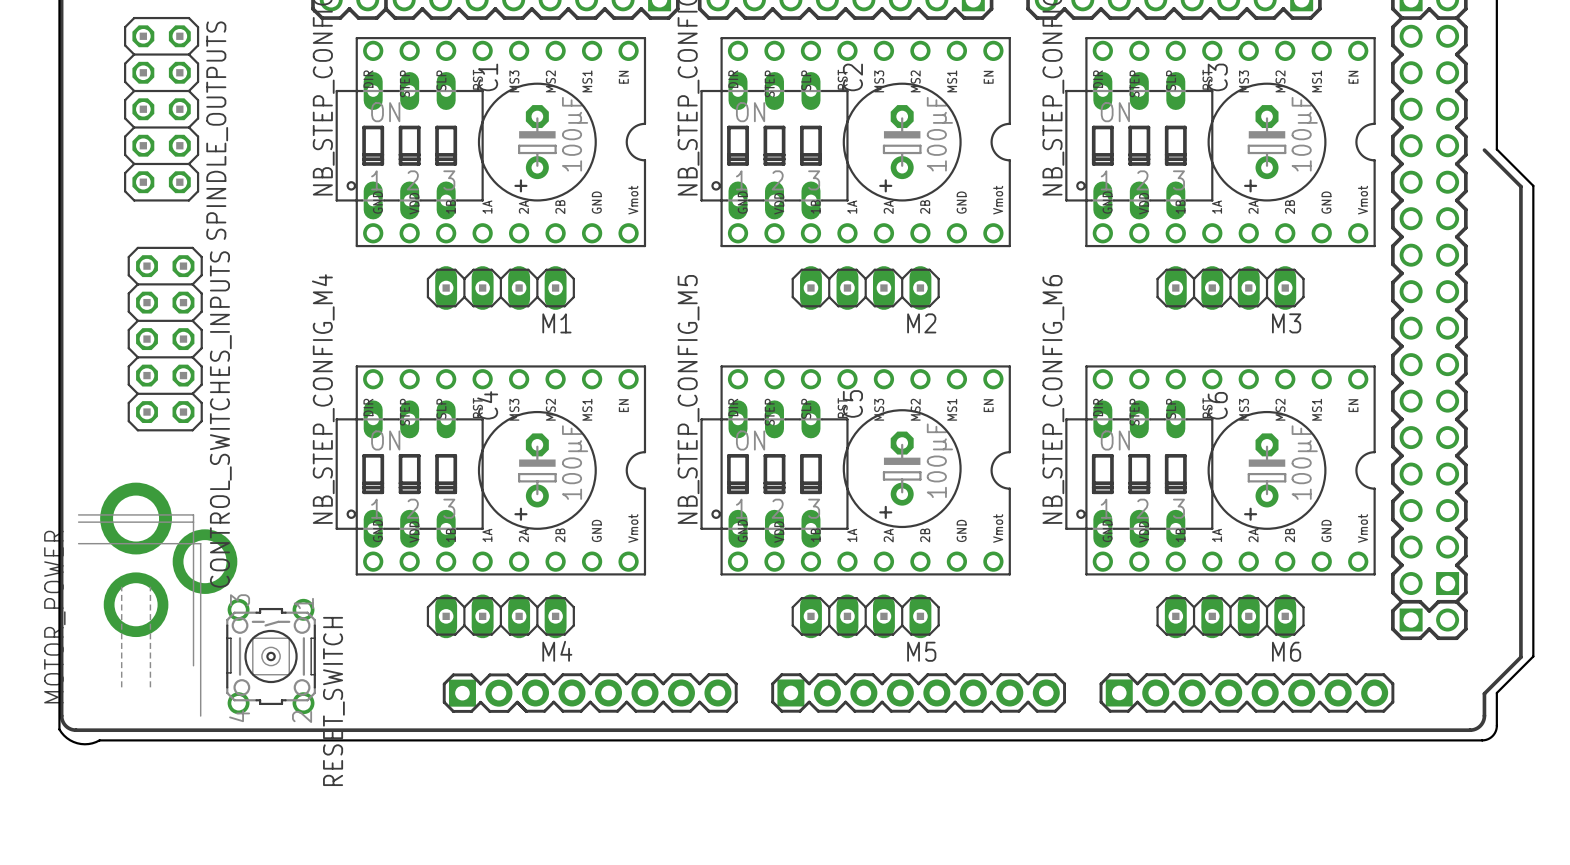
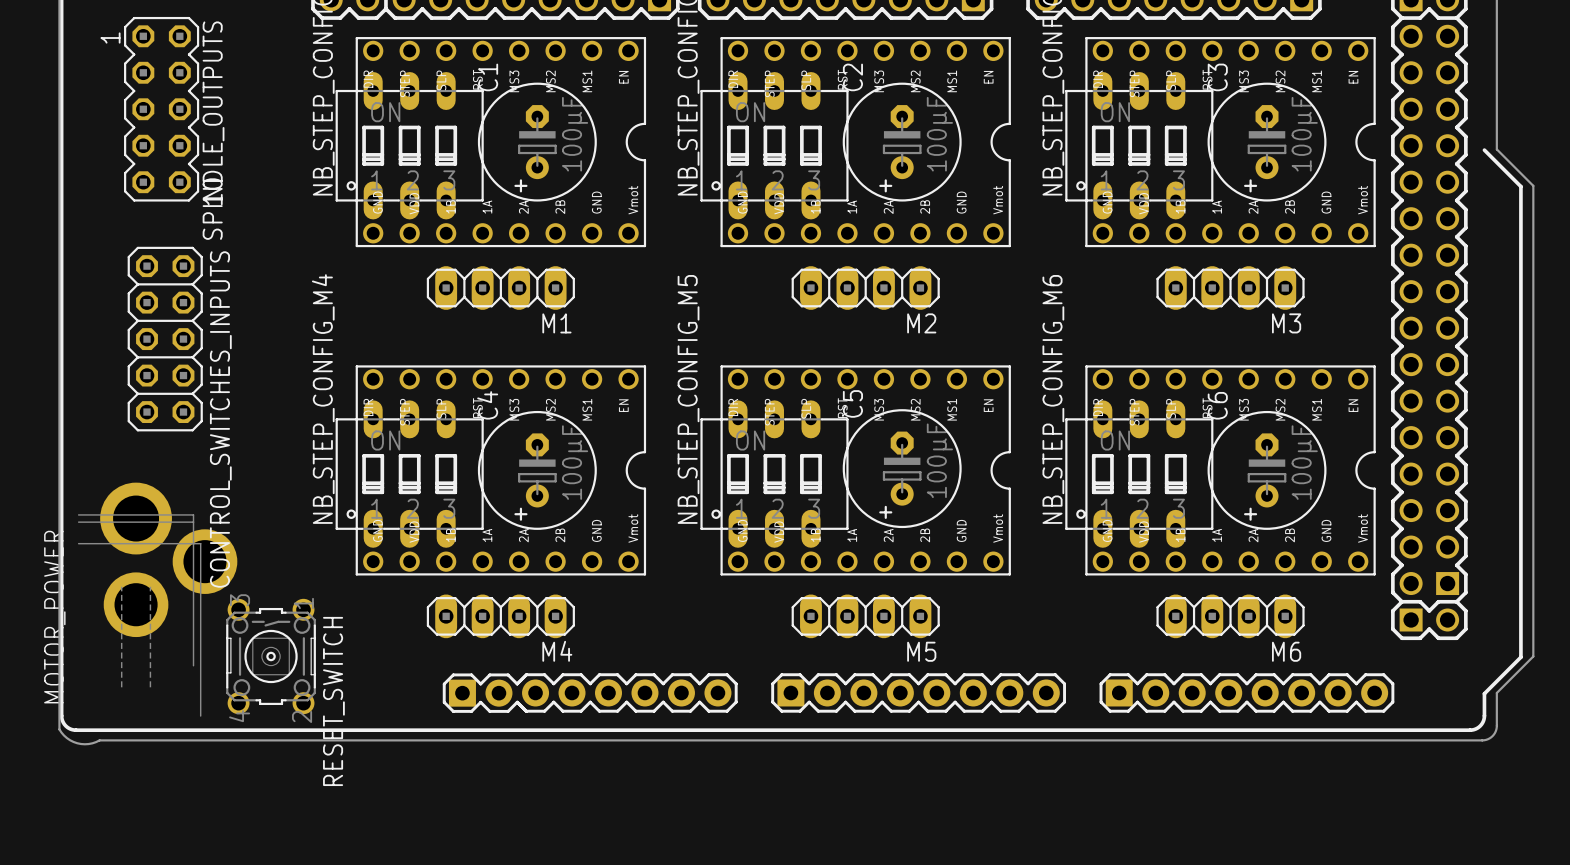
SPINDLE_OUTPUTS footprint: [124, 16, 200, 202] -> [124, 16, 200, 202]

